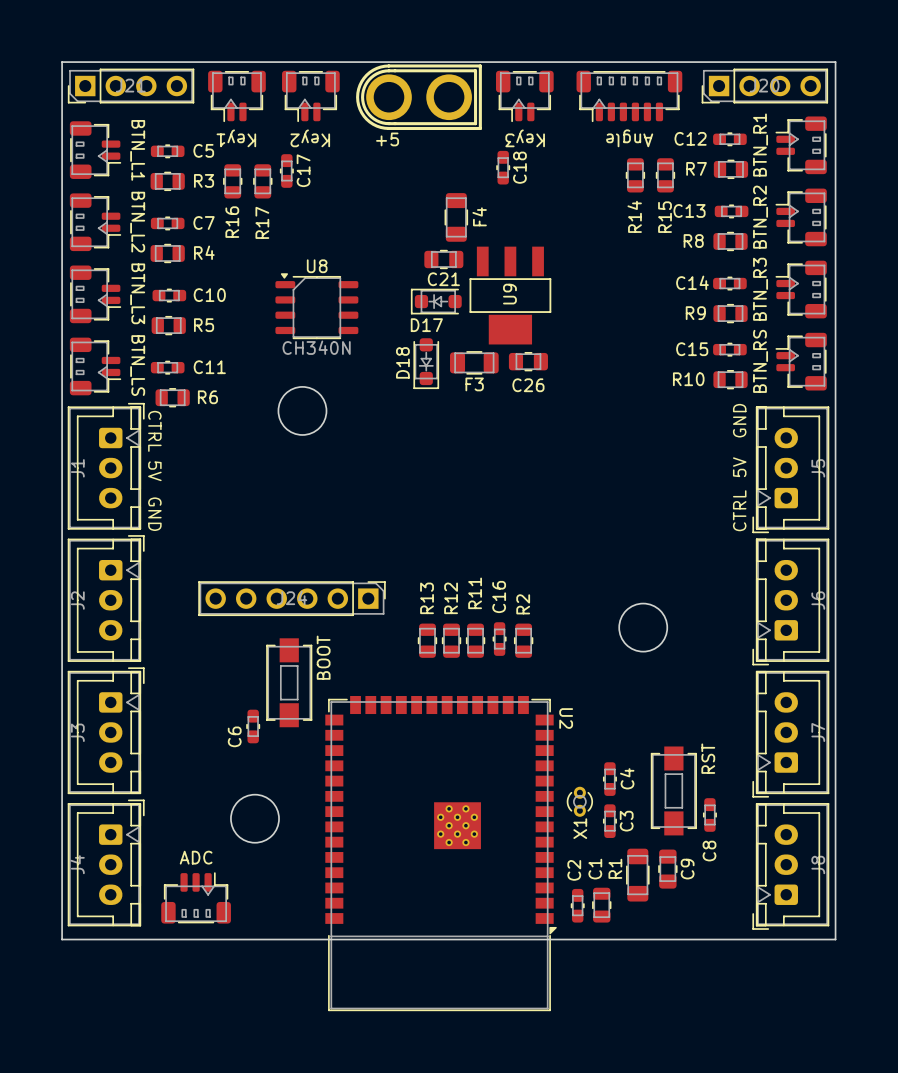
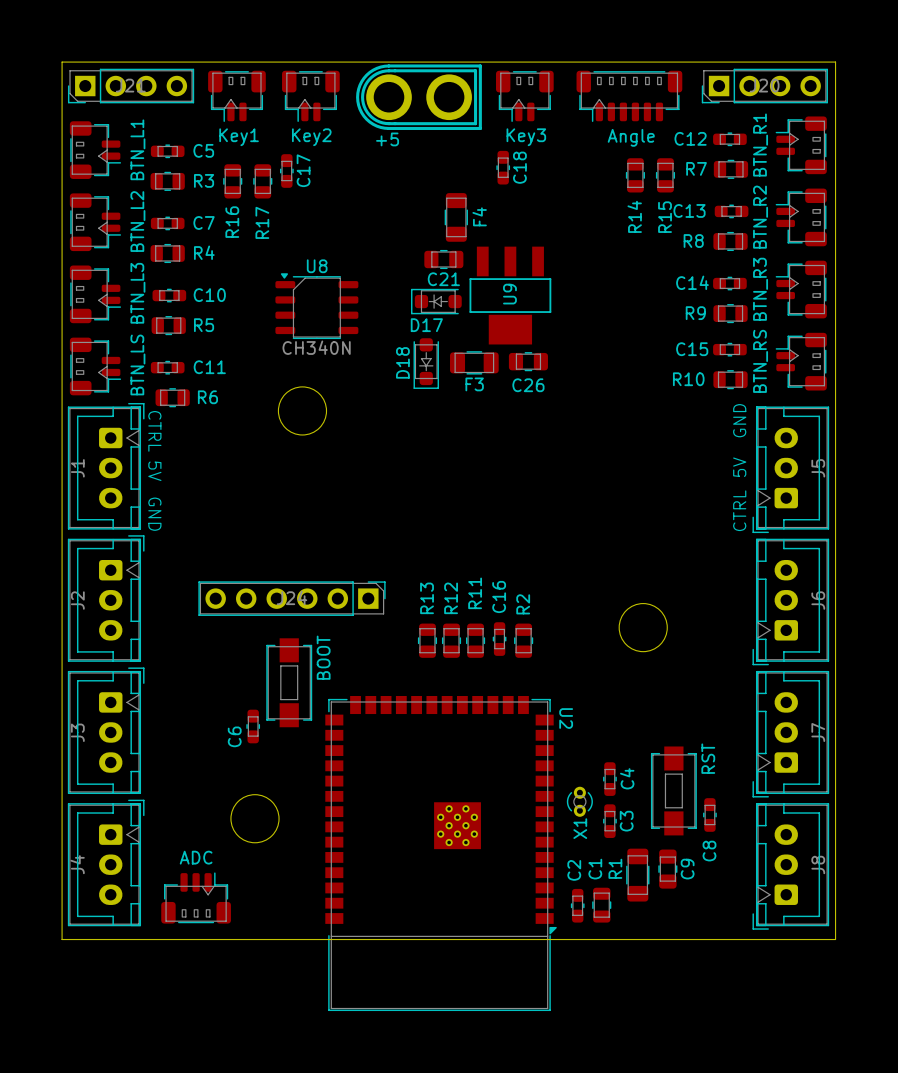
Key1 name rotation: 0° (236, 138) -> 180° (239, 137)
Key2 name rotation: 0° (310, 138) -> 180° (311, 137)
Key3 name rotation: 0° (525, 138) -> 180° (526, 137)
Angle name rotation: 0° (629, 138) -> 180° (631, 137)
BTN_L1 name rotation: 0° (137, 150) -> 180° (137, 149)
BTN_L2 name rotation: 0° (137, 222) -> 180° (137, 221)
BTN_L3 name rotation: 0° (137, 293) -> 180° (137, 293)
BTN_LS name rotation: 0° (137, 365) -> 180° (137, 364)

